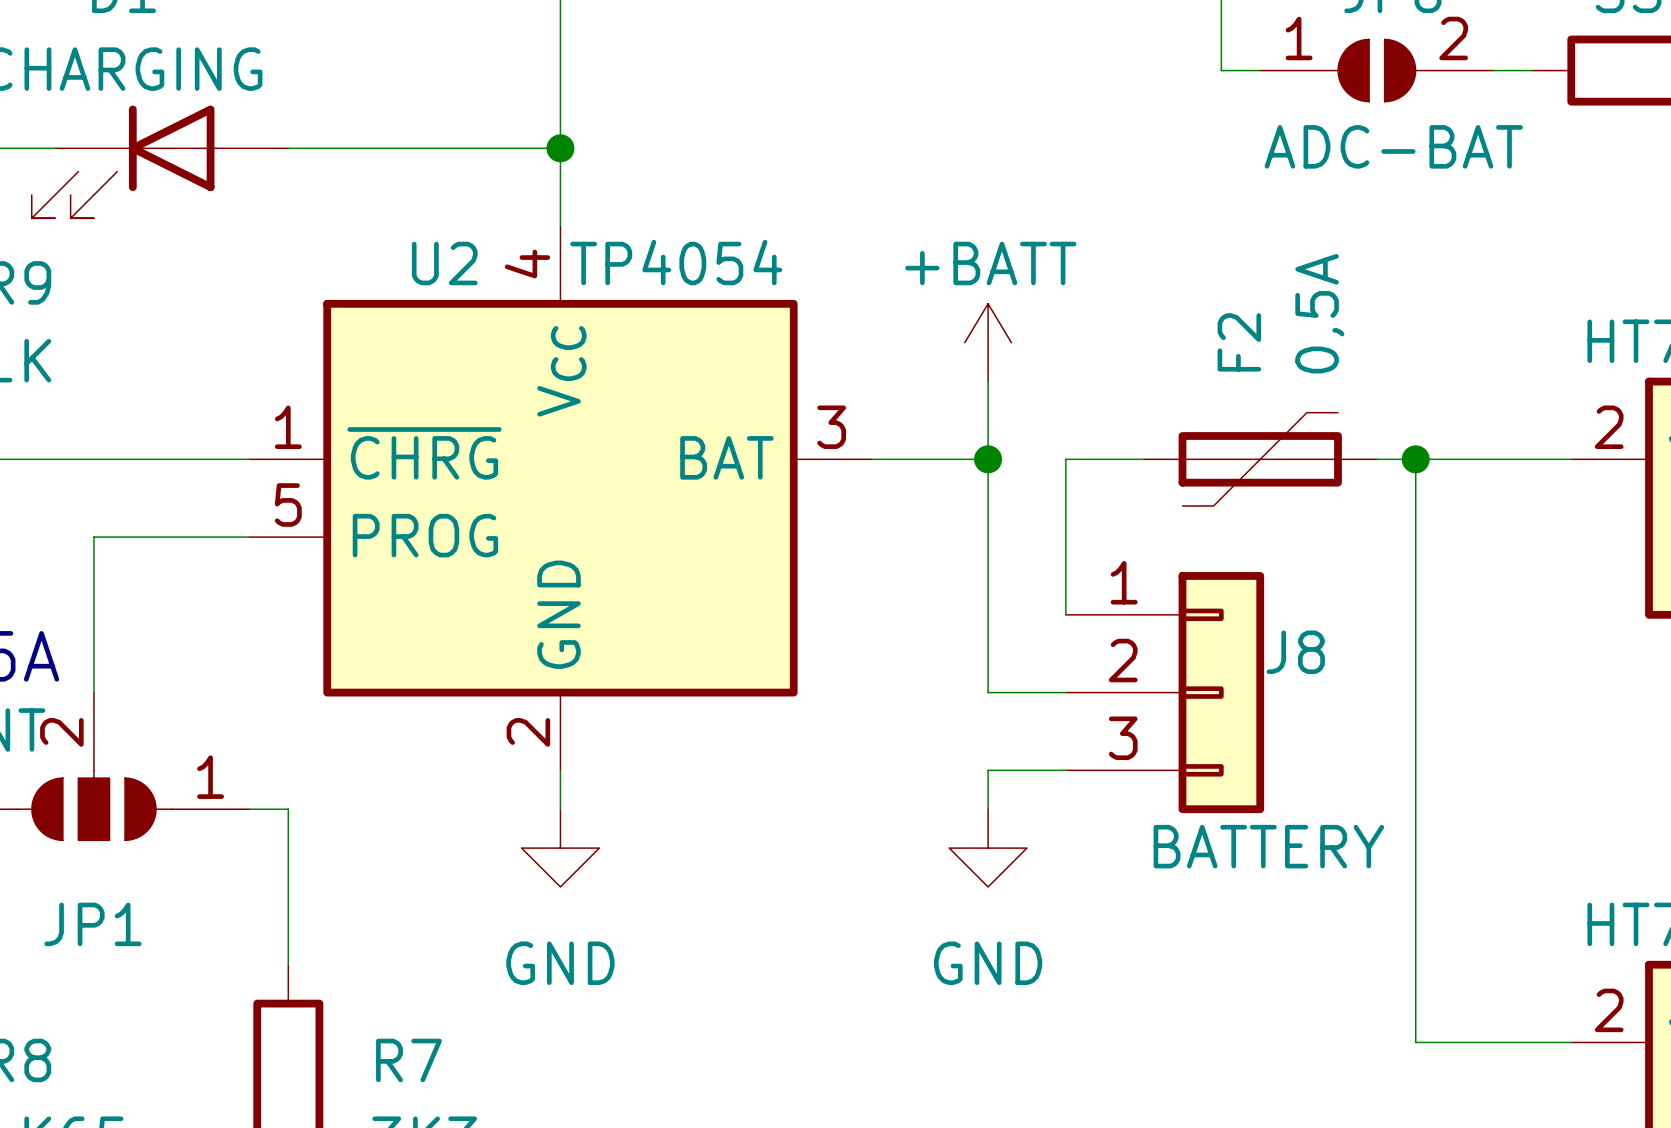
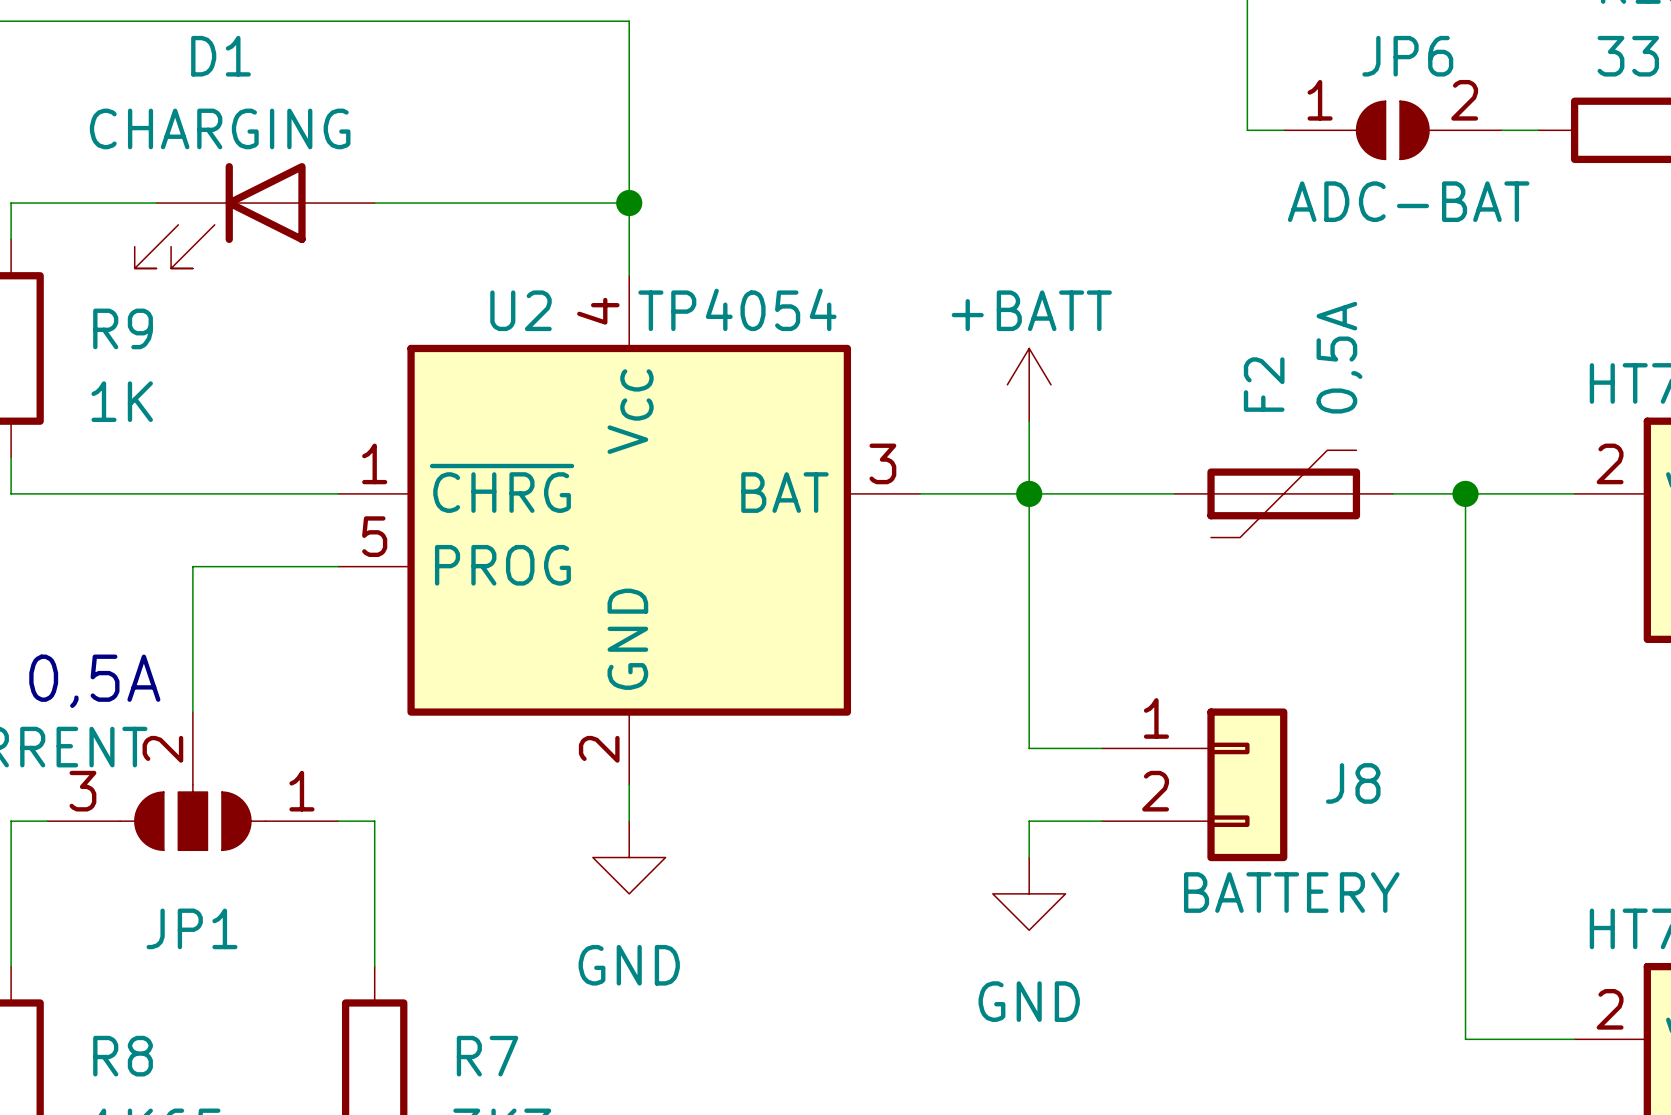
wire: (1065, 459) (1065, 614) -> (1101, 493) (1029, 493)
wire: (1415, 459) (1415, 1042) (1454, 1042) -> (1465, 493) (1465, 1039)
junction position: (1415, 459) -> (1465, 493)
J8 symbol: [1065, 572, 1265, 814] -> [1101, 708, 1288, 862]
wire: (988, 692) (1065, 692) -> (1029, 712) (1029, 748) (1101, 748)
wire: (1065, 770) (988, 770) (988, 809) -> (1101, 821) (1029, 821) (1029, 857)
power symbol position: GND (988, 848) -> GND (1029, 893)

